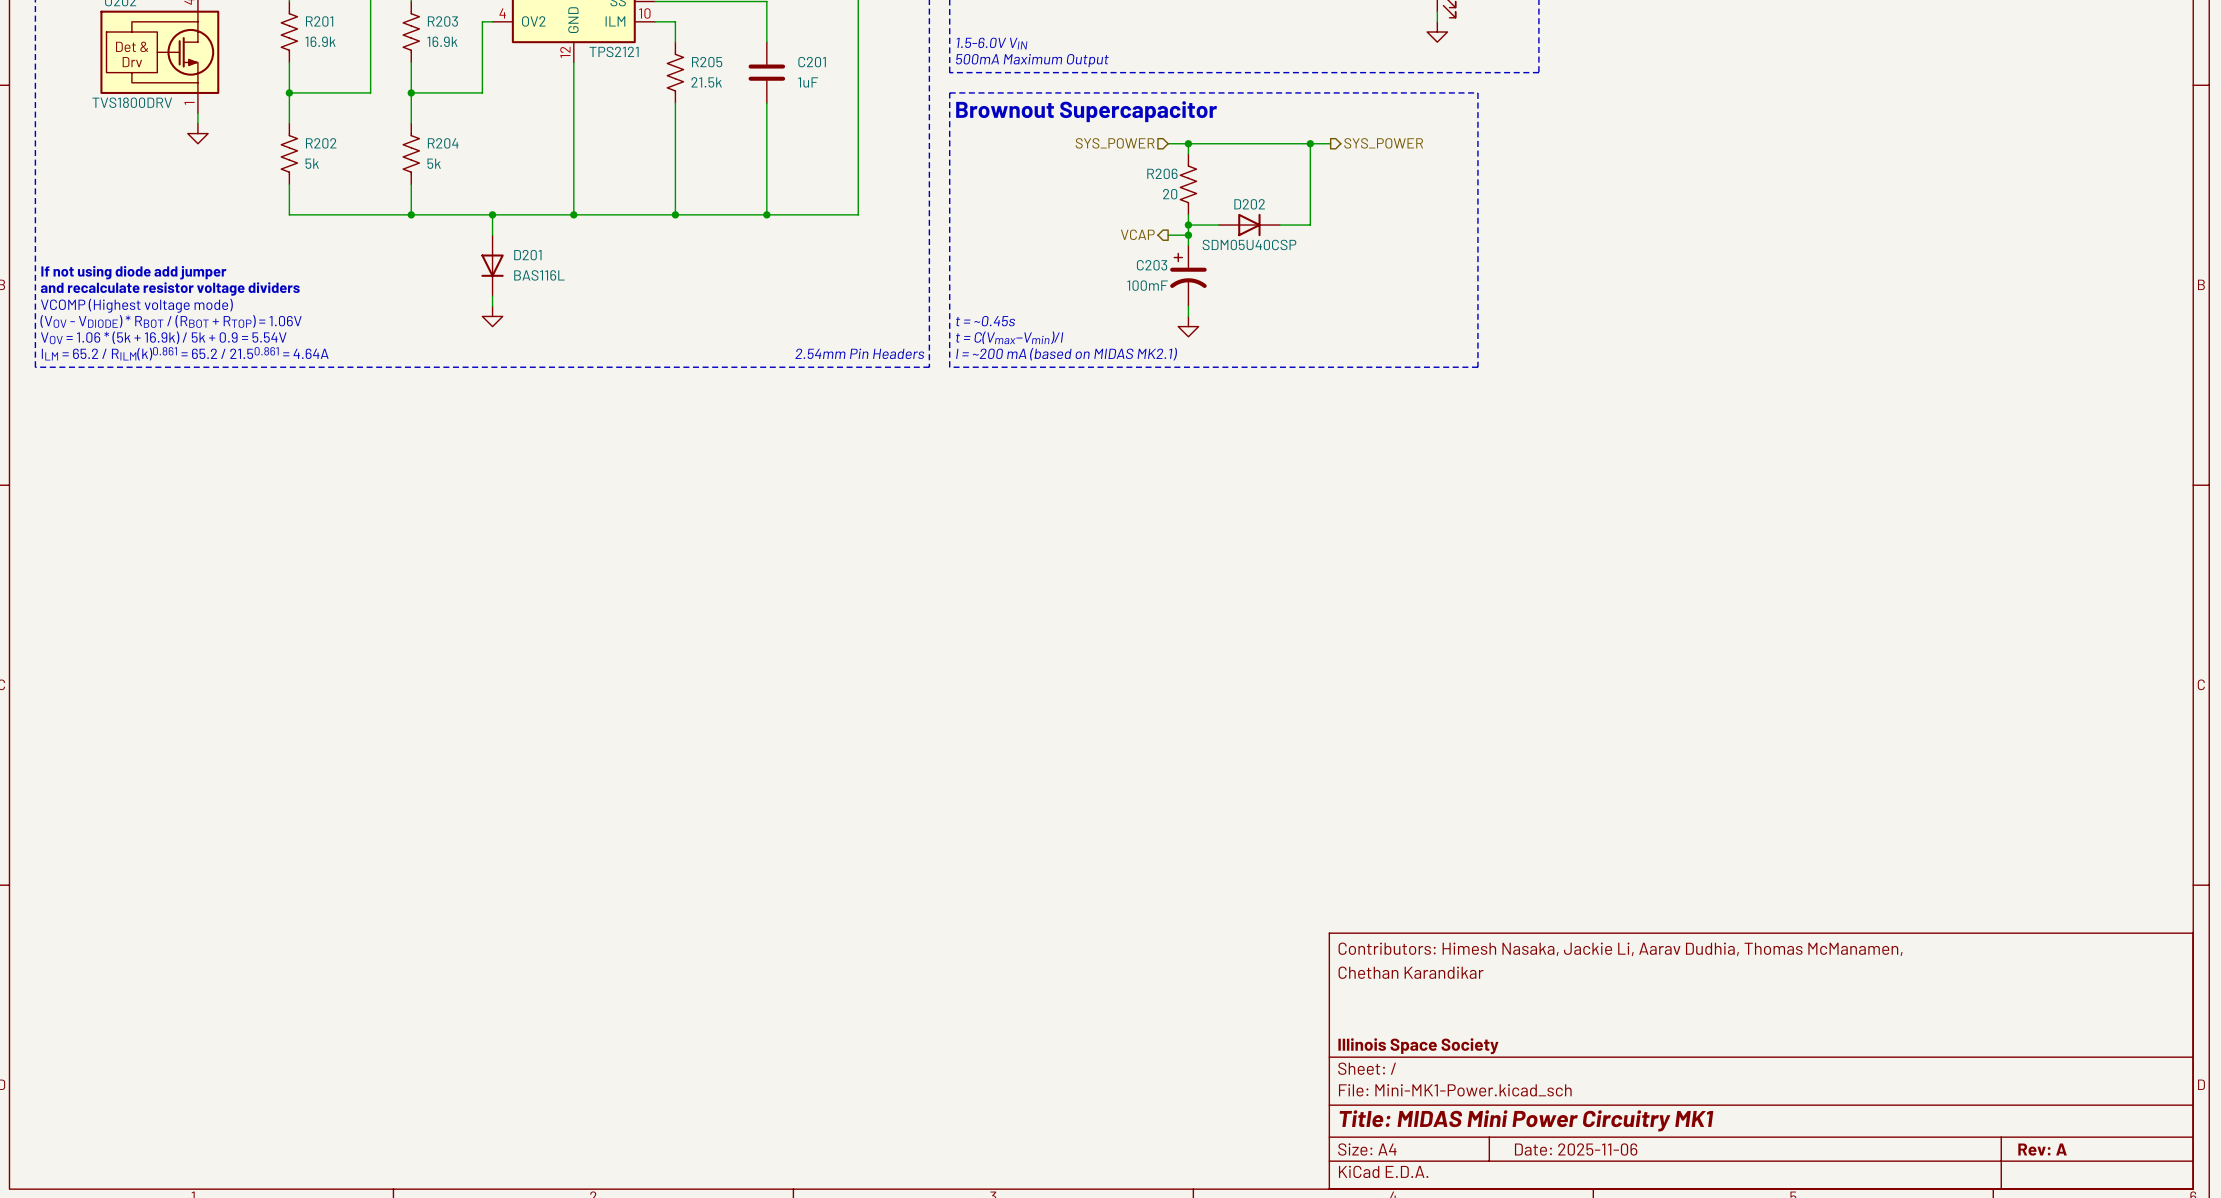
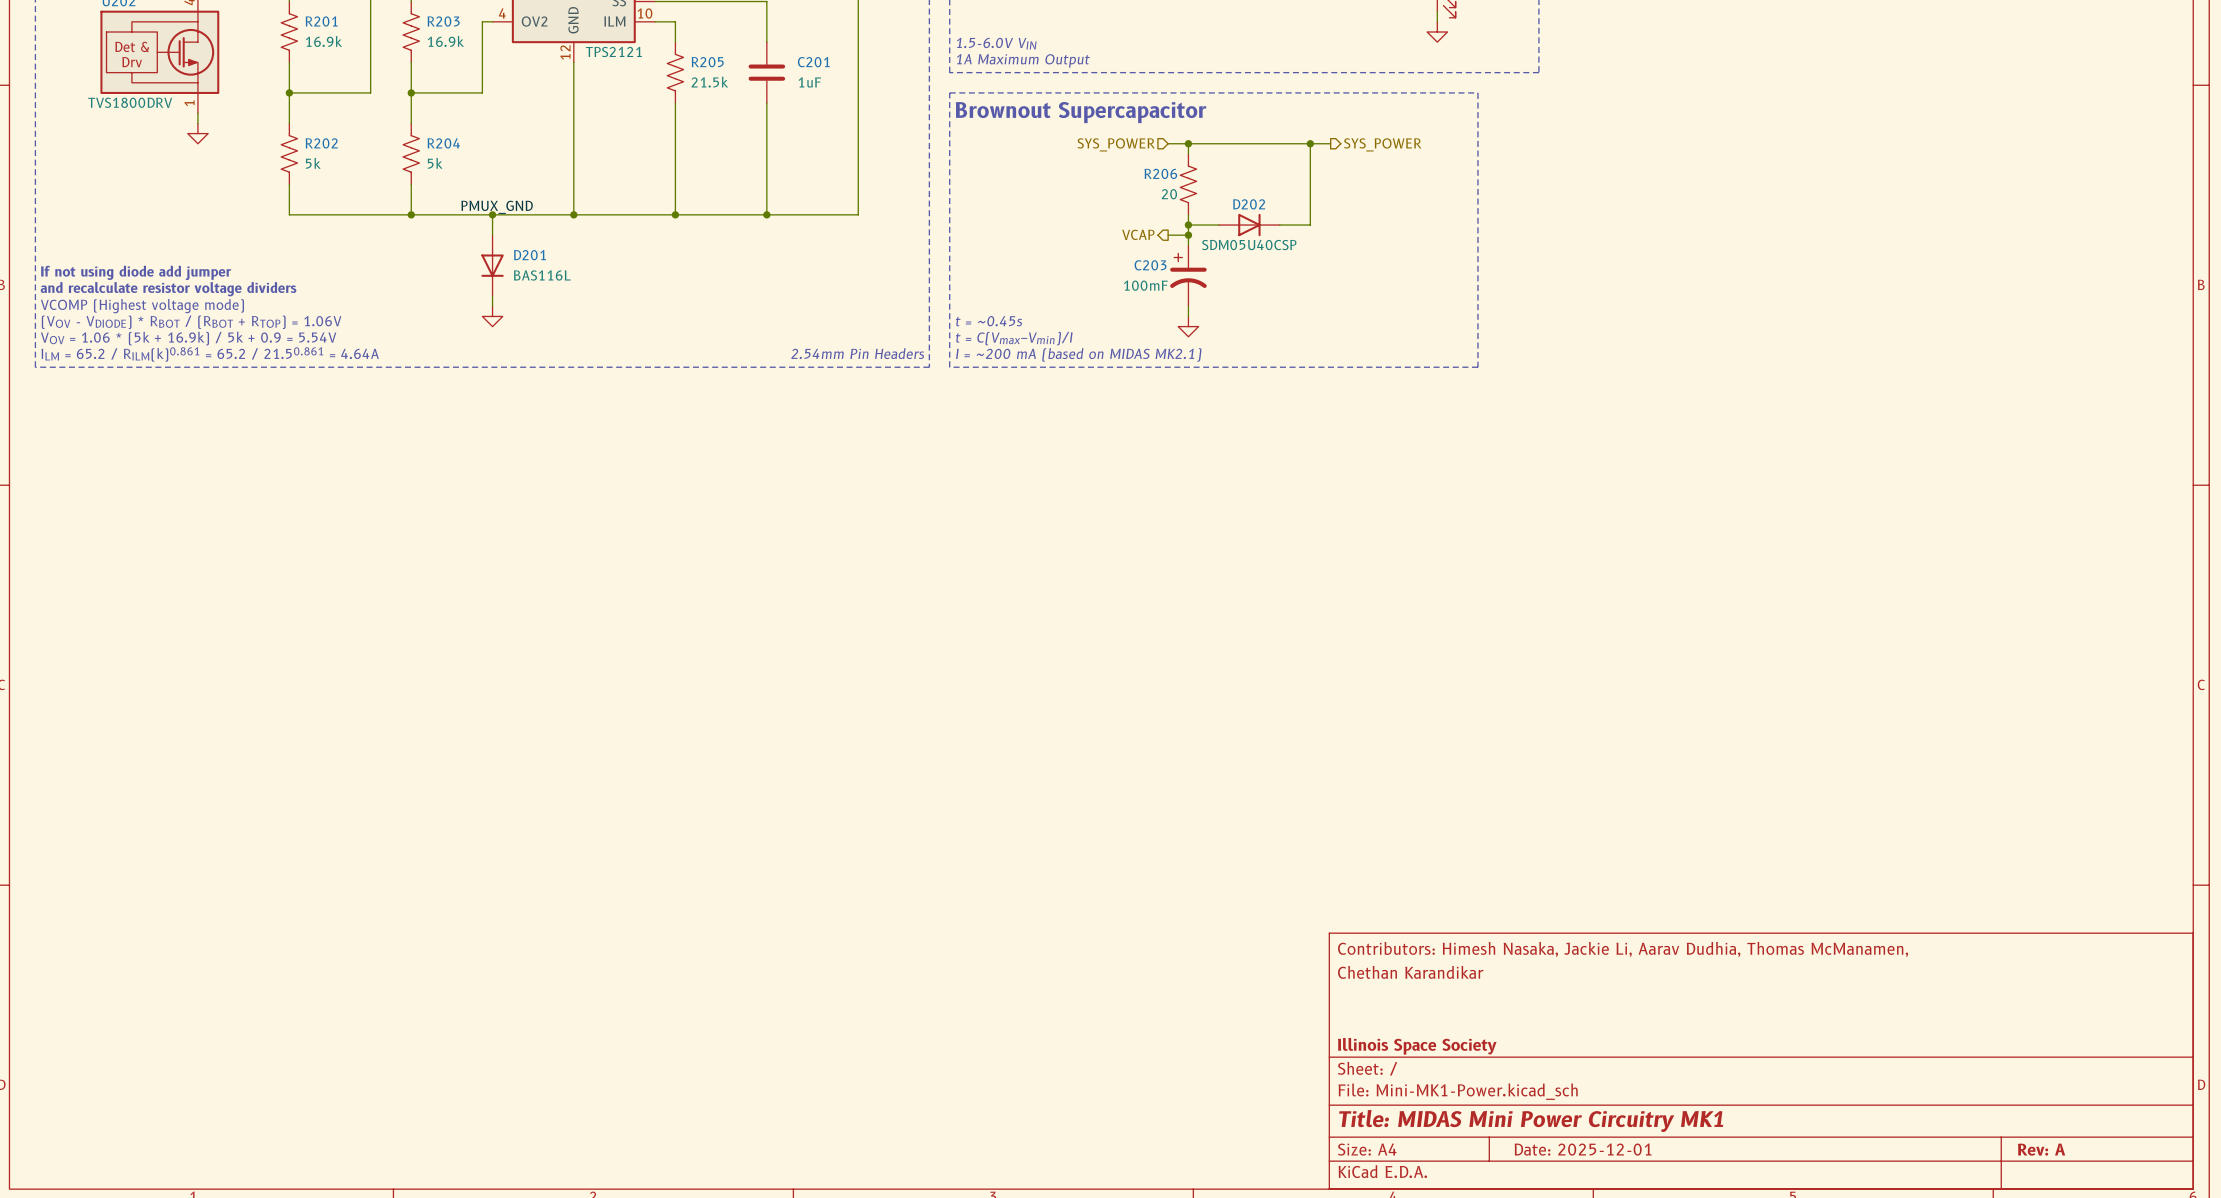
text: 500mA Maximum Output (1032, 60) -> 1A Maximum Output (1023, 60)
label: none -> PMUX_GND (497, 207)
title block: Date: 2025-11-06 (1576, 1149) -> Date: 2025-12-01 (1583, 1149)

